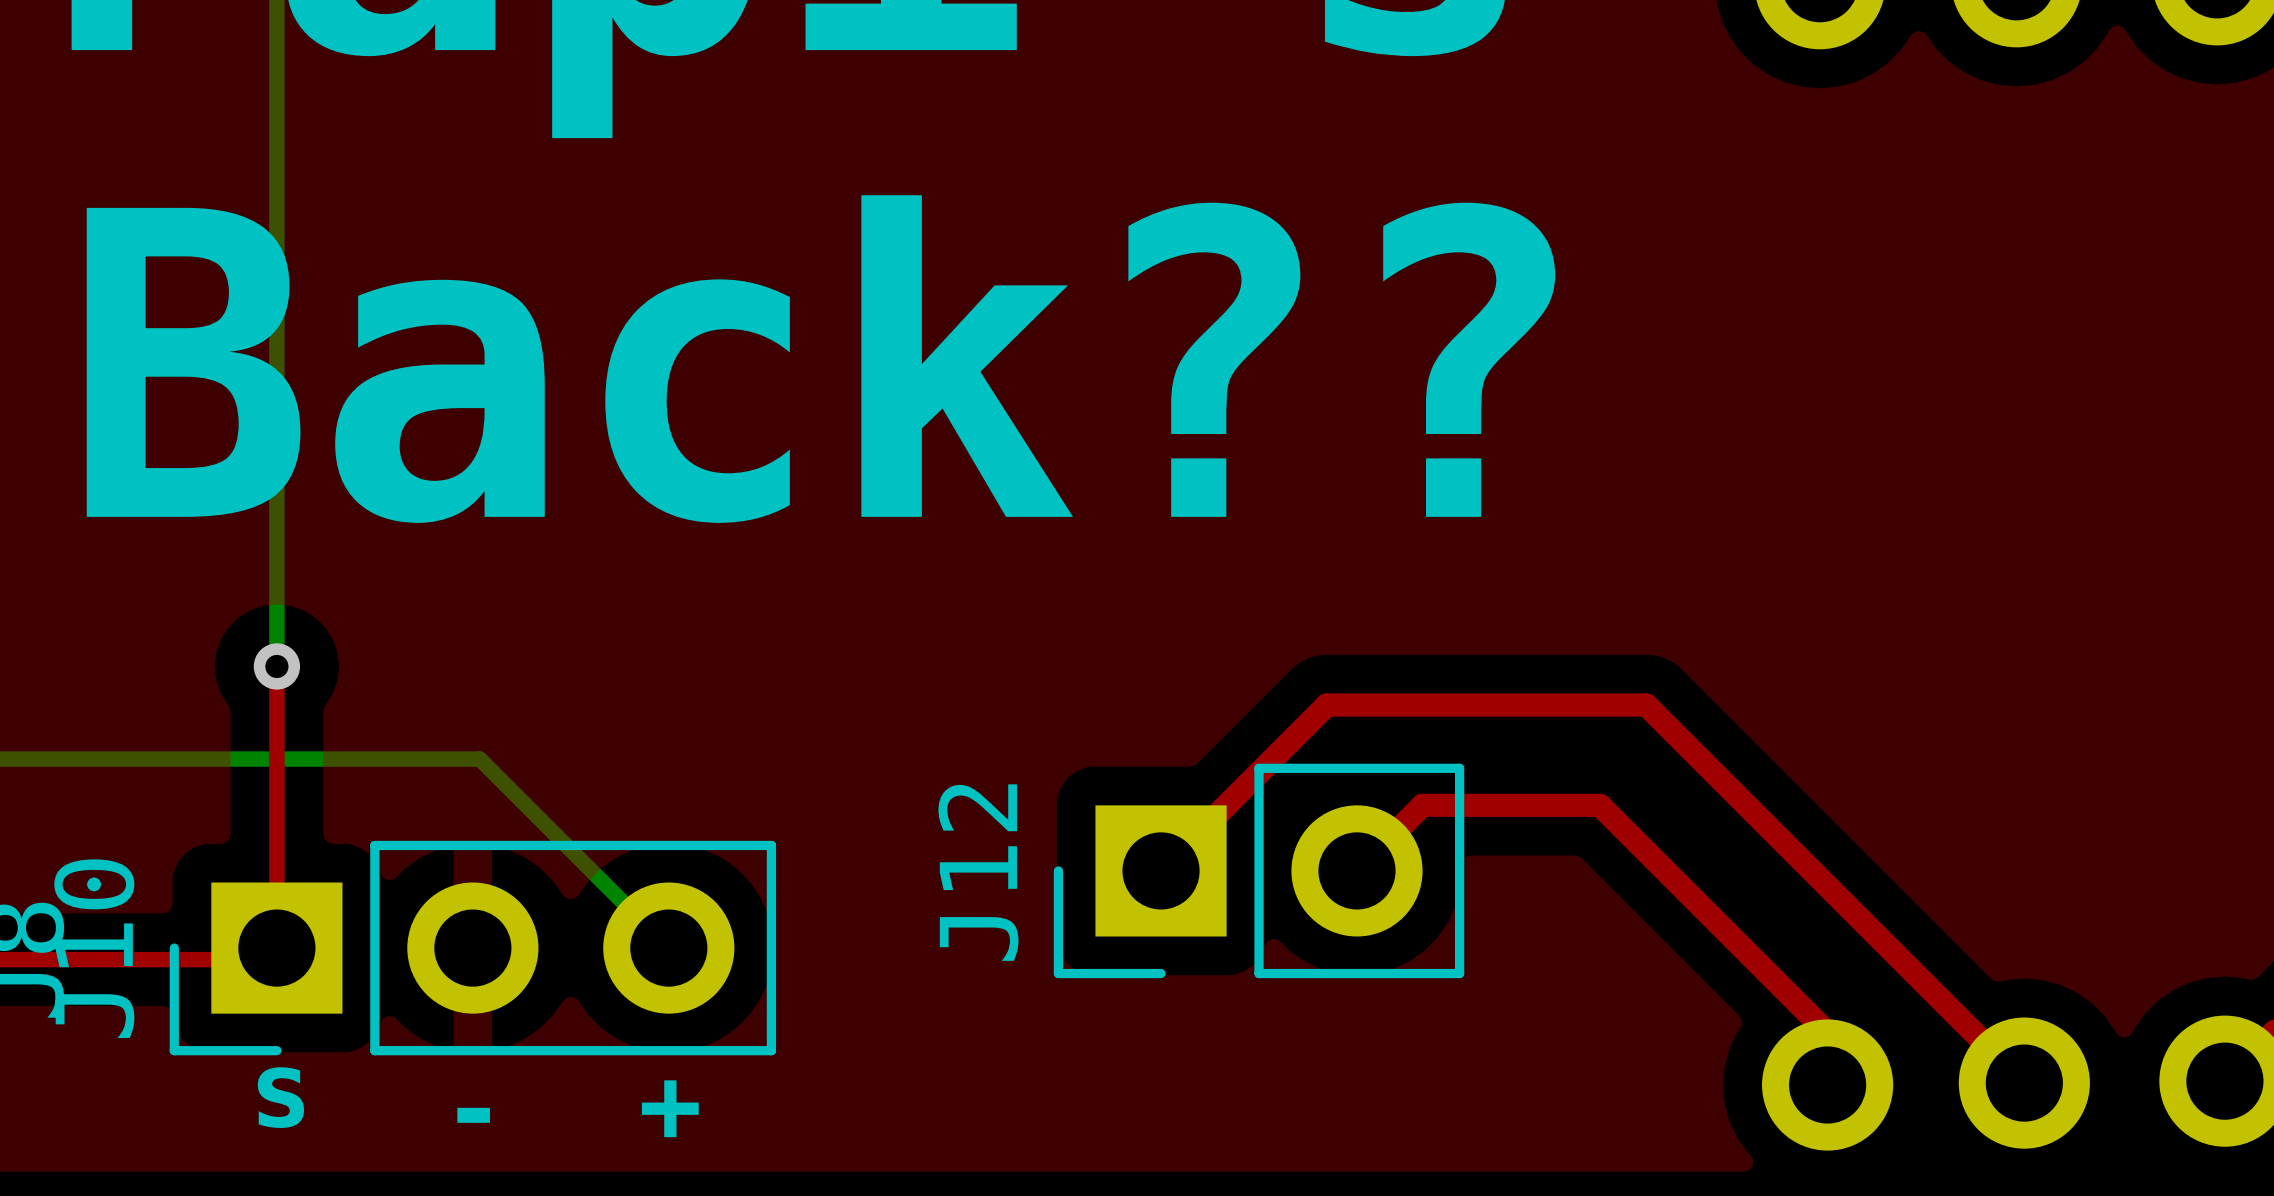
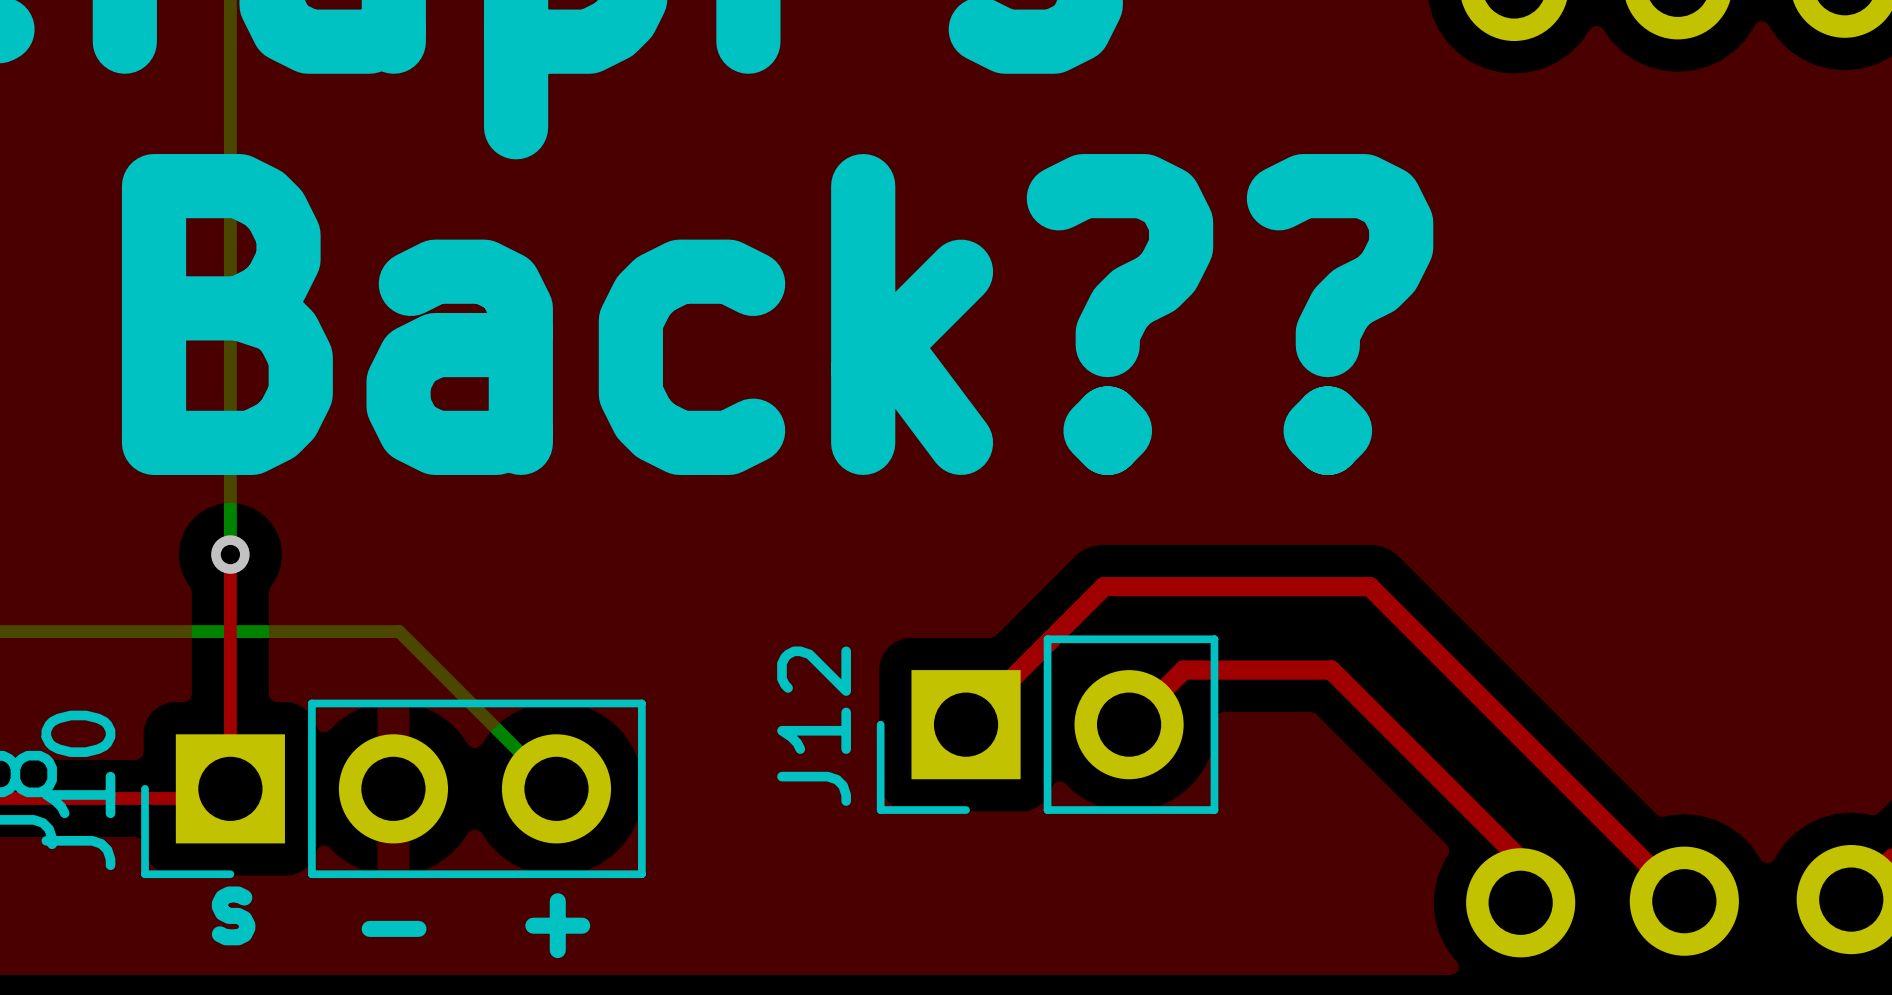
text position: Back?? (820, 359) -> Back?? (777, 314)

